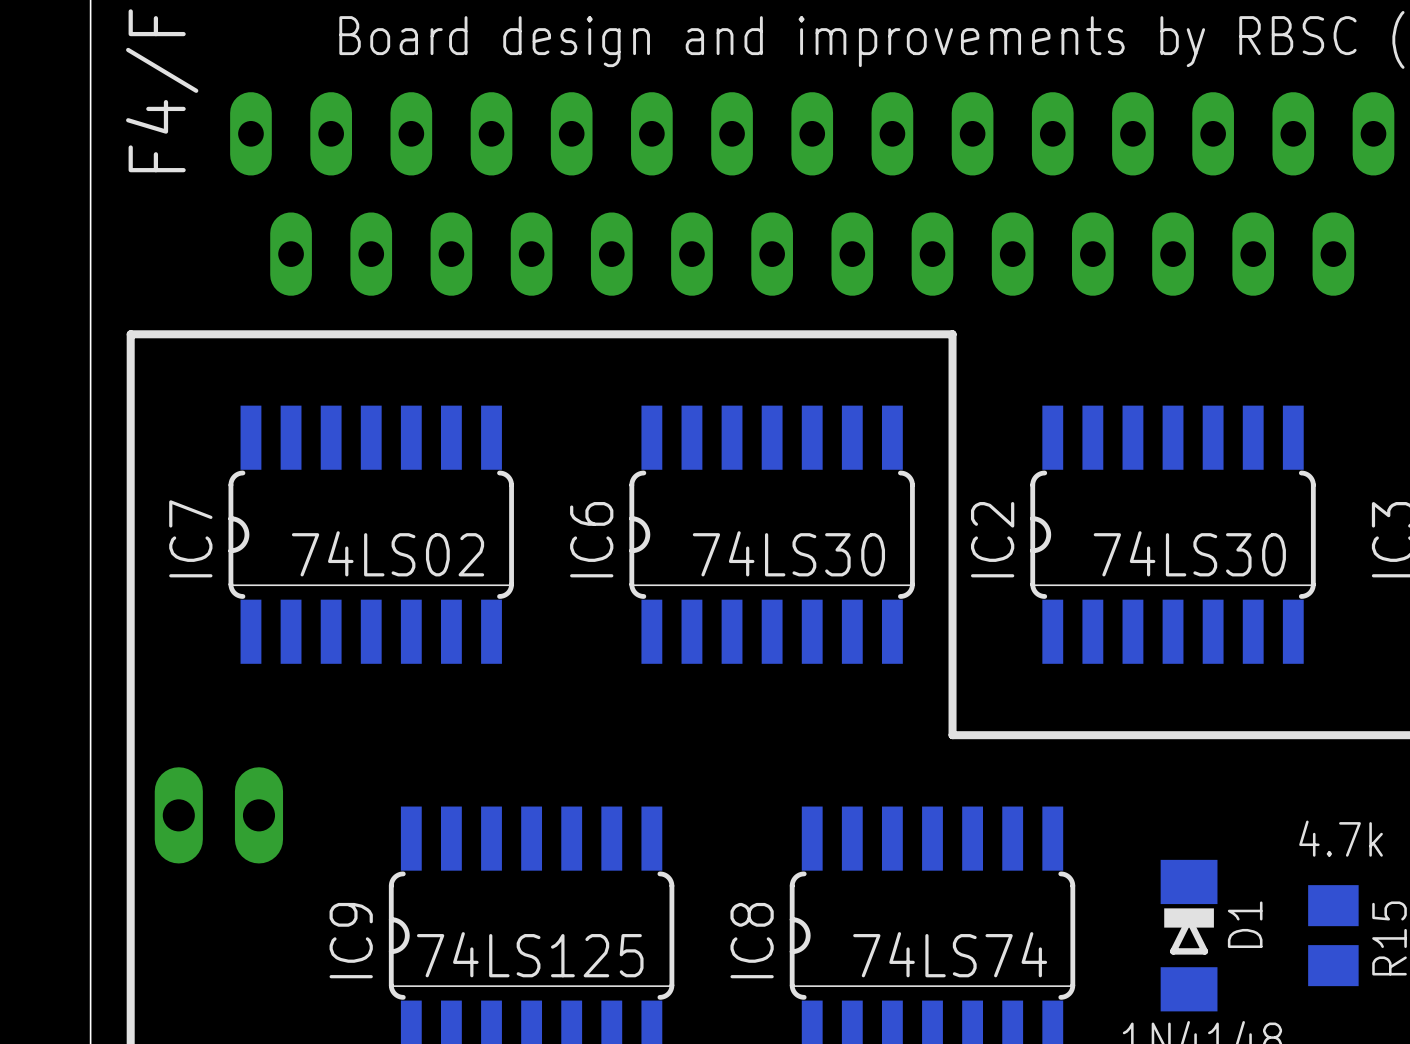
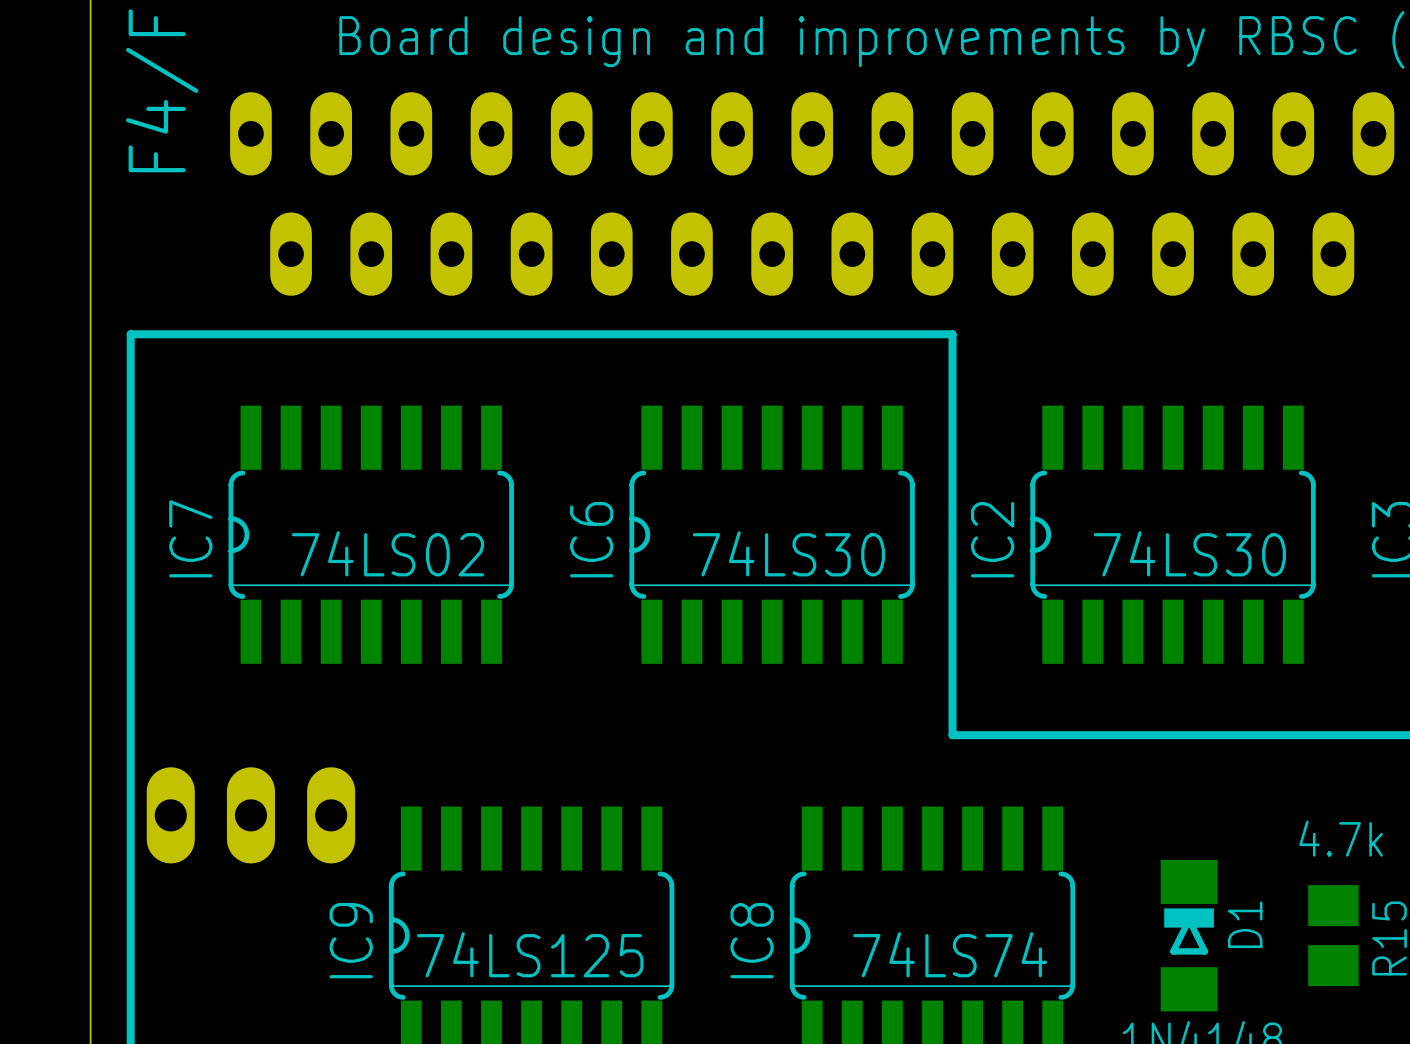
part: (218, 815) -> none
part: none -> (250, 815)

